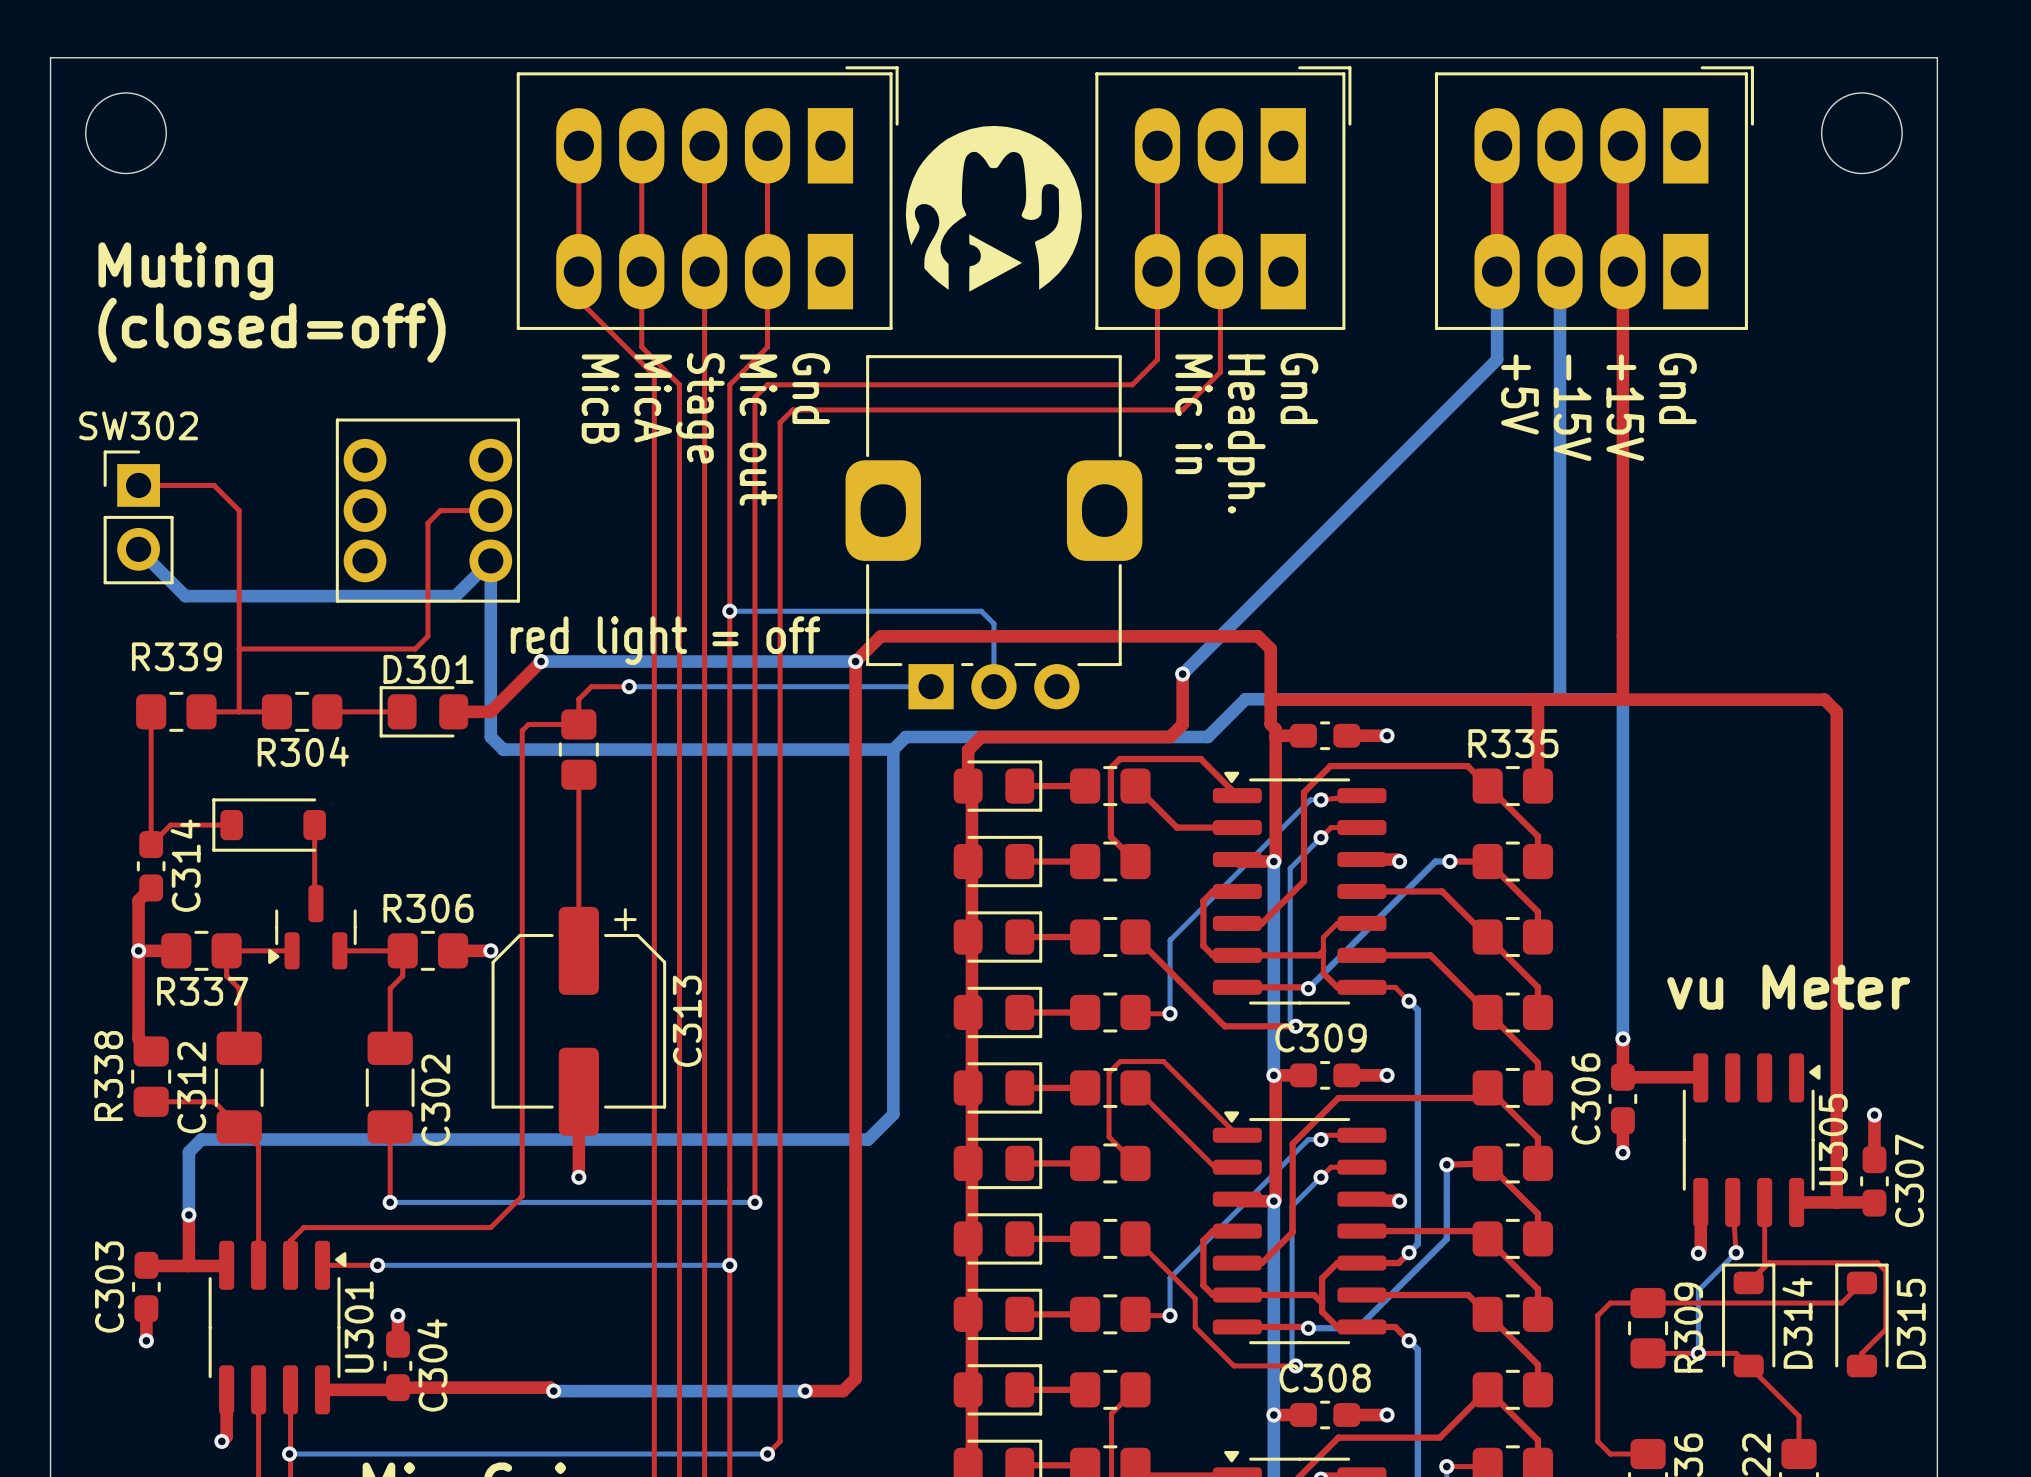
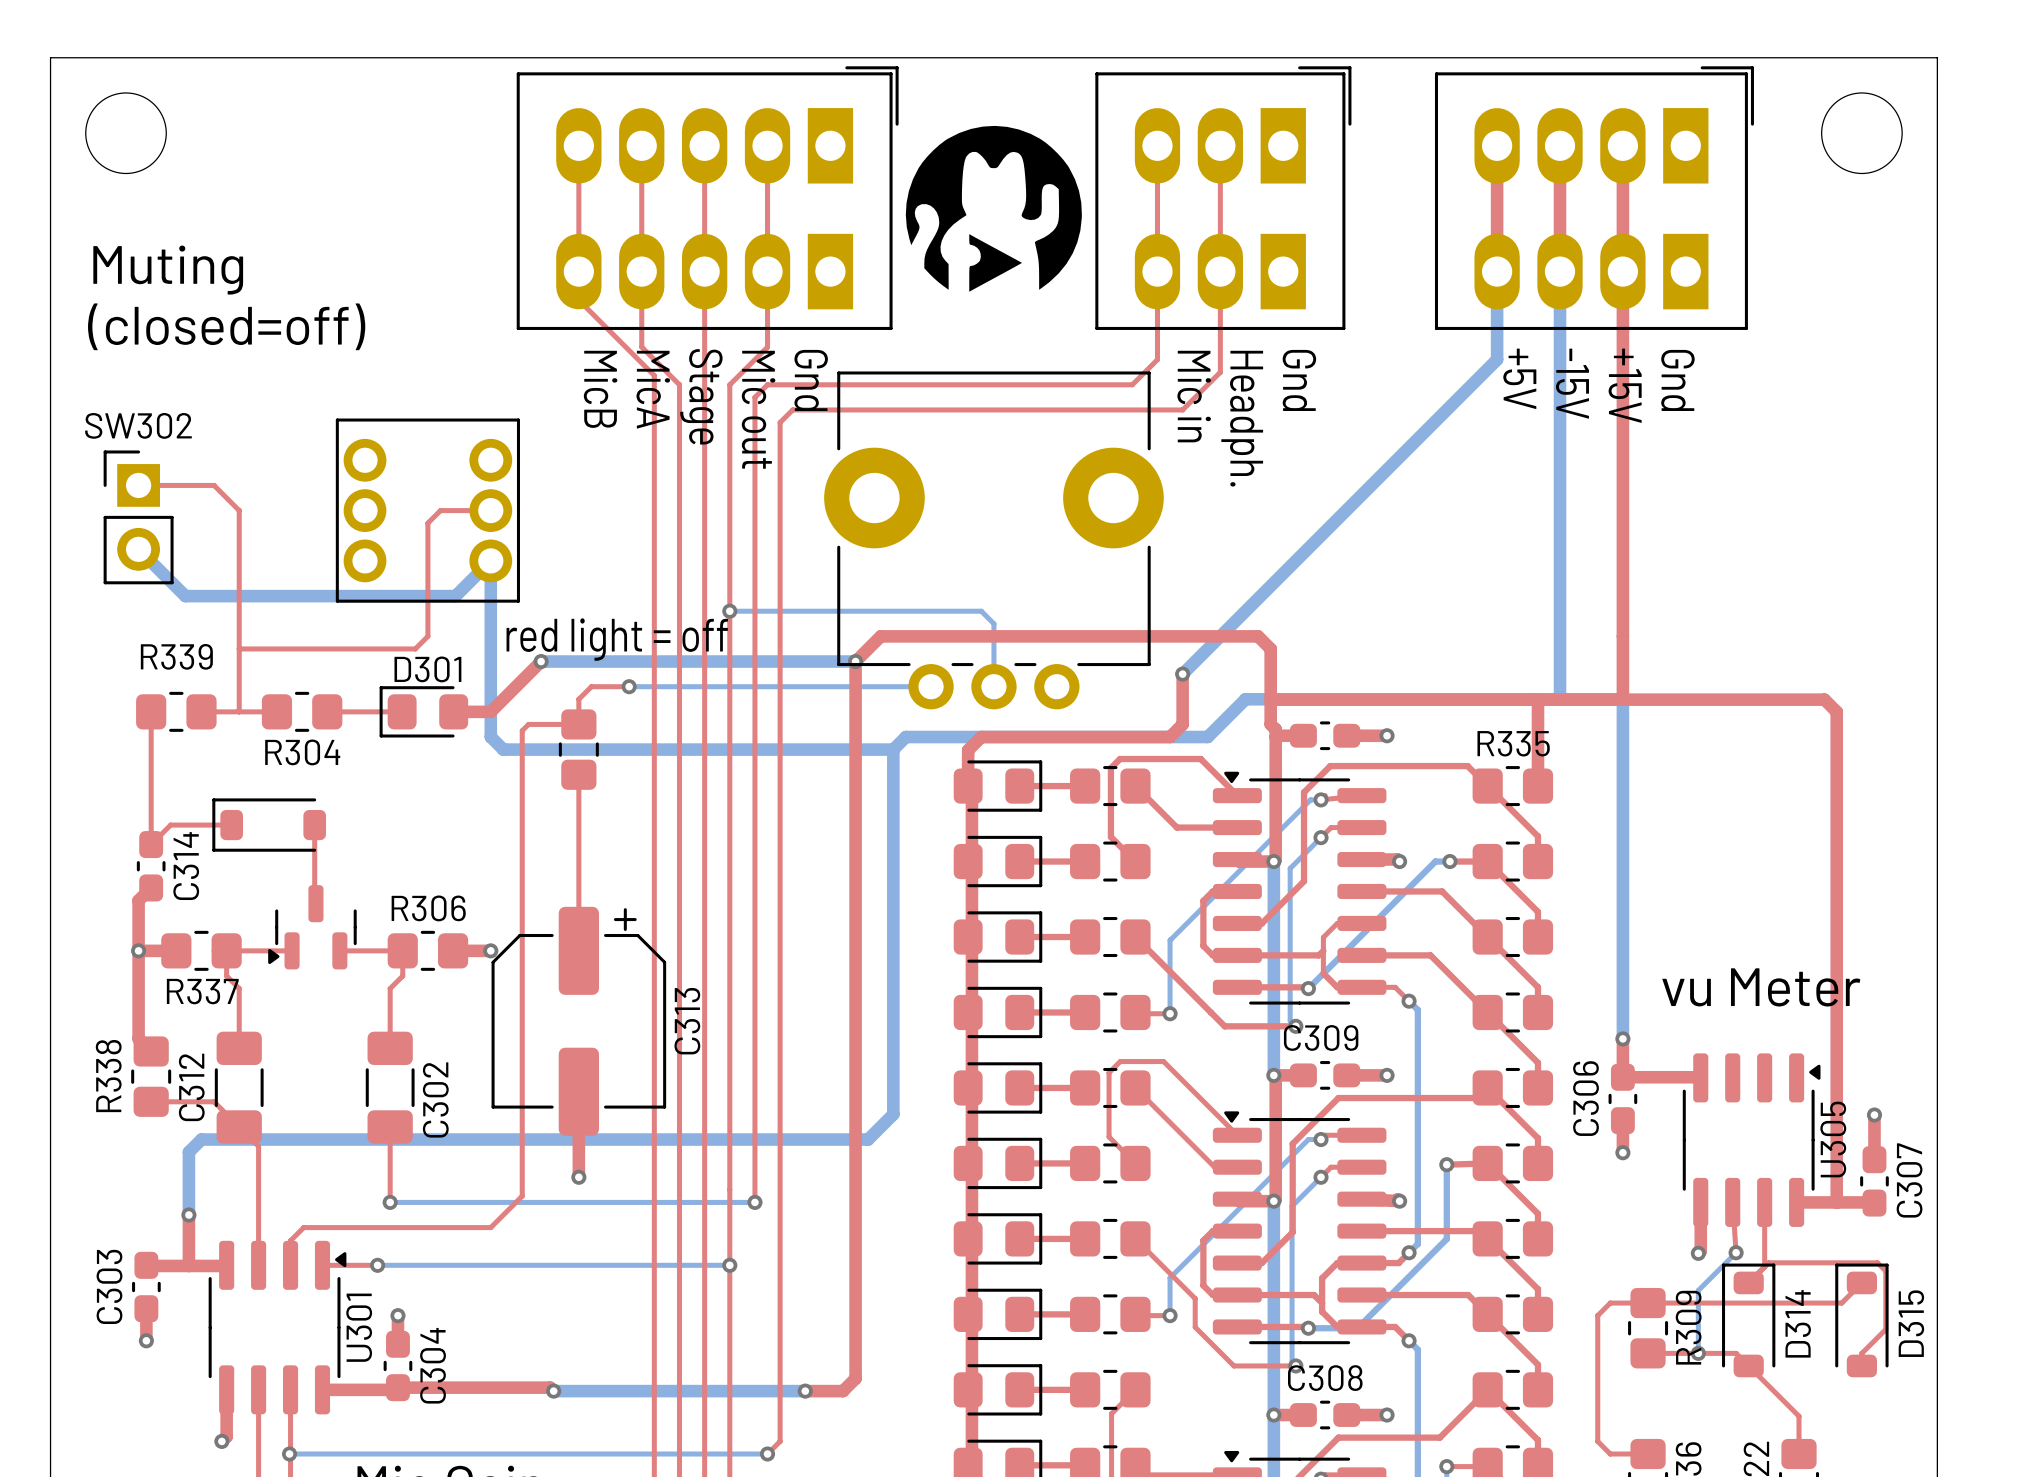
part footprint: [845, 355, 1143, 710] -> [824, 371, 1164, 710]

